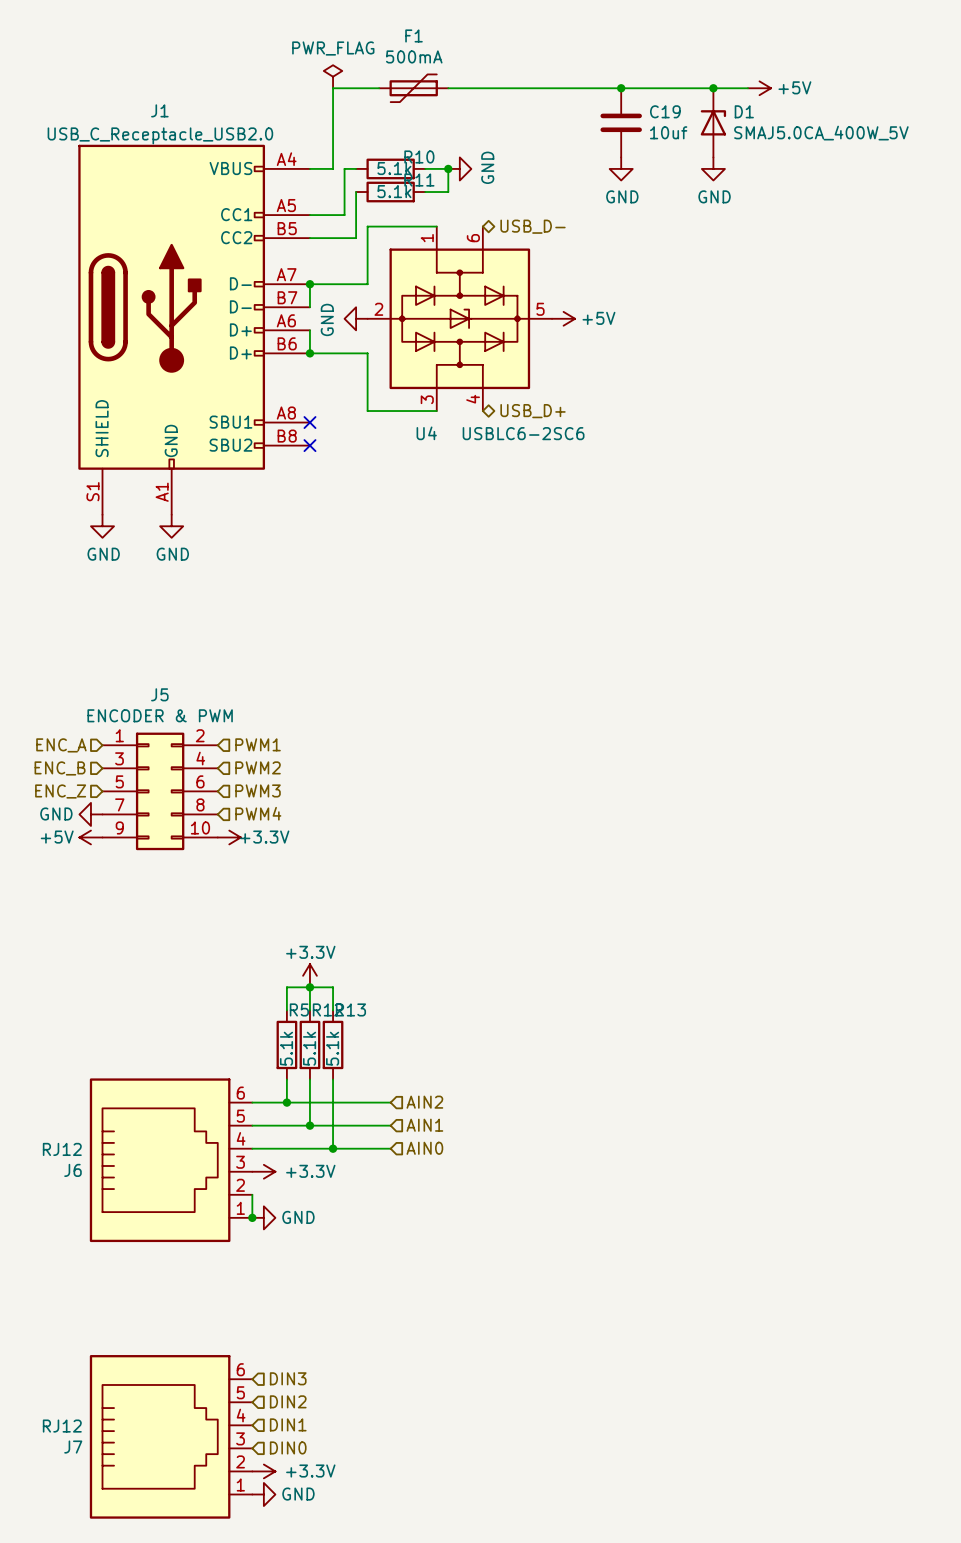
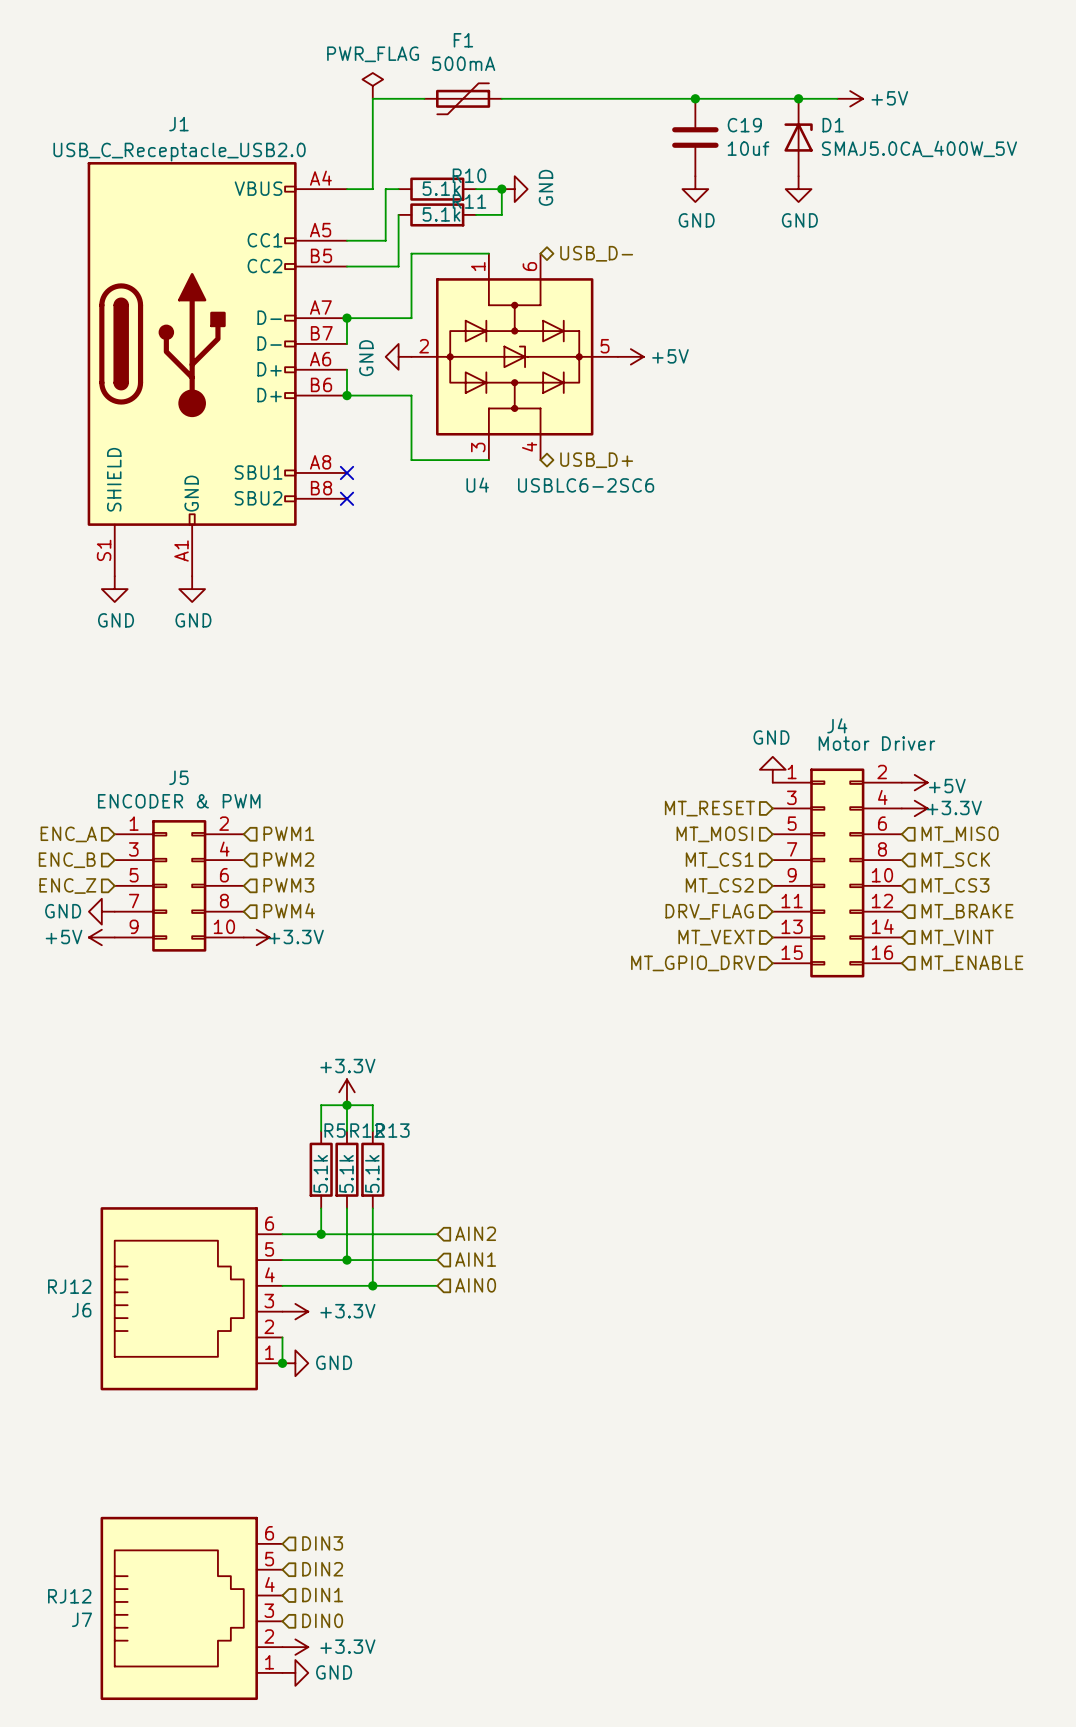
power symbol: none -> GND (772, 769)
power symbol: none -> +5V (914, 782)
hierarchical label: none -> MT_RESET (709, 808)
power symbol: none -> +3.3V (914, 808)
hierarchical label: none -> MT_MOSI (714, 834)
hierarchical label: none -> MT_MISO (960, 834)
hierarchical label: none -> MT_CS1 (719, 860)
hierarchical label: none -> MT_SCK (955, 860)
J4: none -> Motor Driver (837, 872)
hierarchical label: none -> MT_CS2 (719, 886)
hierarchical label: none -> MT_CS3 (955, 886)
hierarchical label: none -> DRV_FLAG (709, 911)
hierarchical label: none -> MT_BRAKE (967, 911)
hierarchical label: none -> MT_VEXT (716, 937)
hierarchical label: none -> MT_VINT (957, 937)
hierarchical label: none -> MT_GPIO_DRV (693, 963)
hierarchical label: none -> MT_ENABLE (972, 963)

